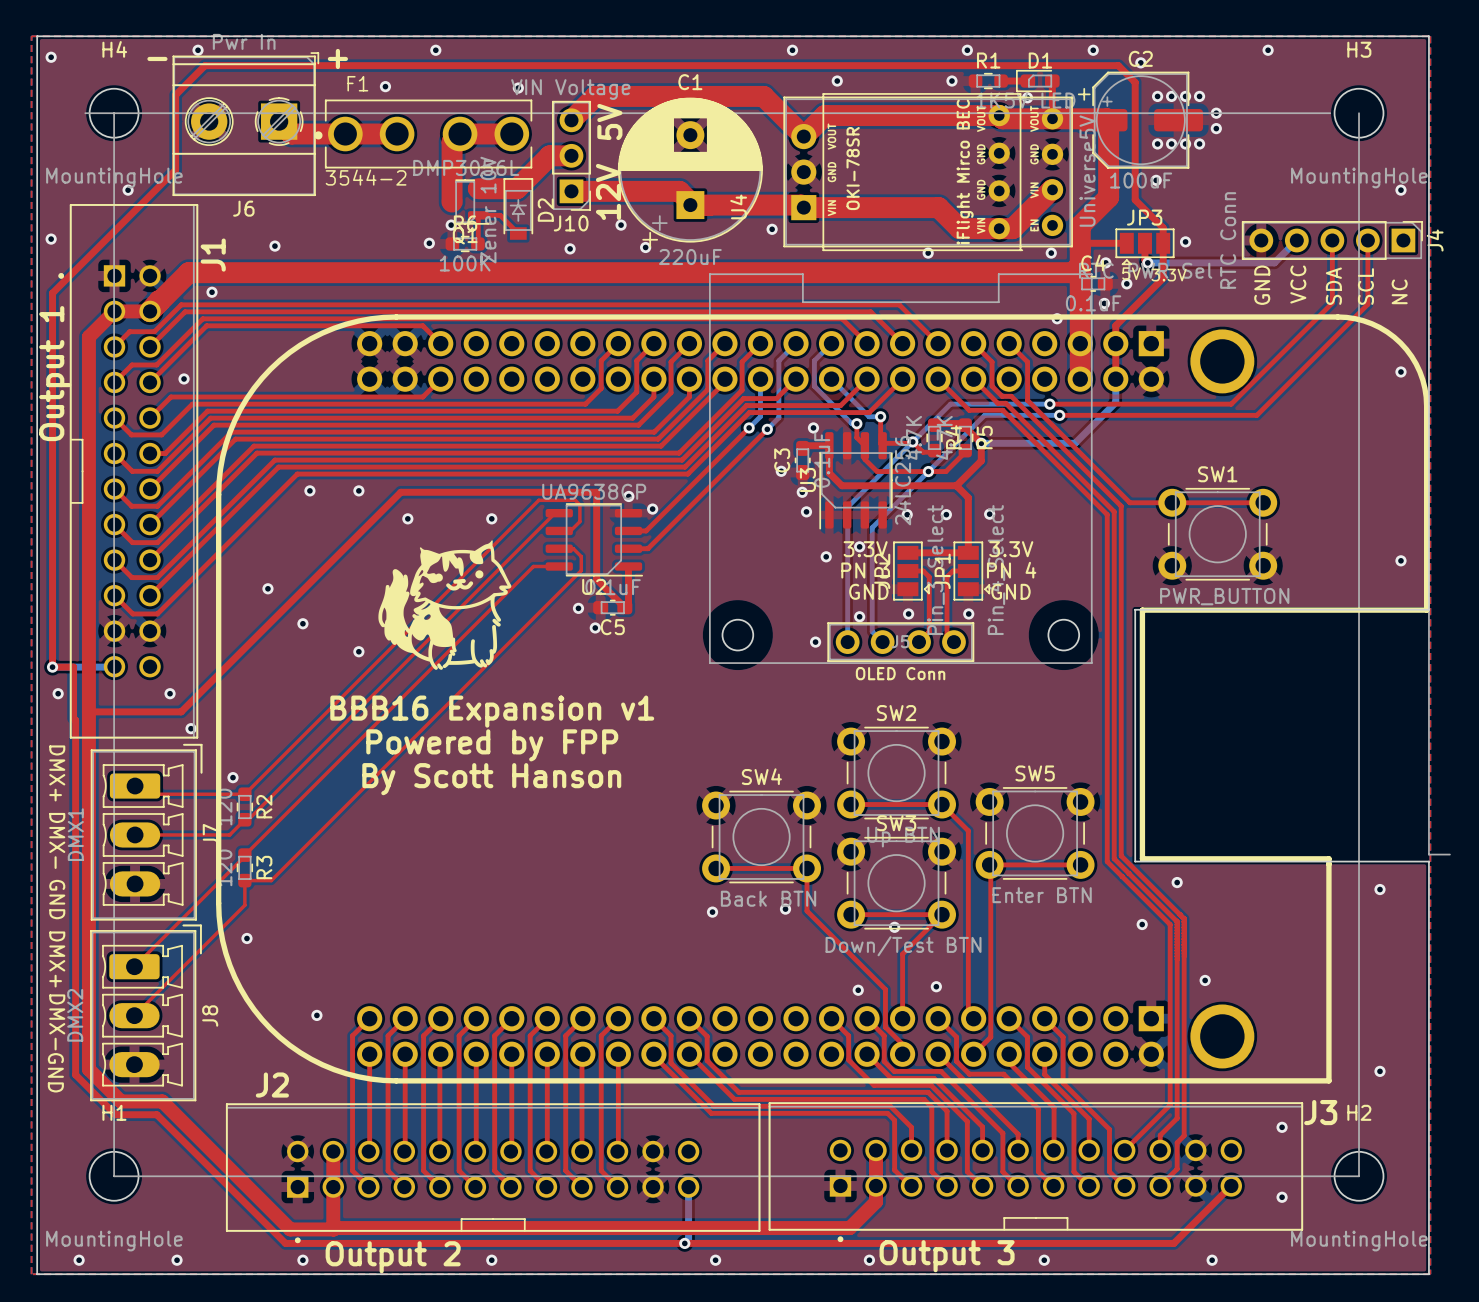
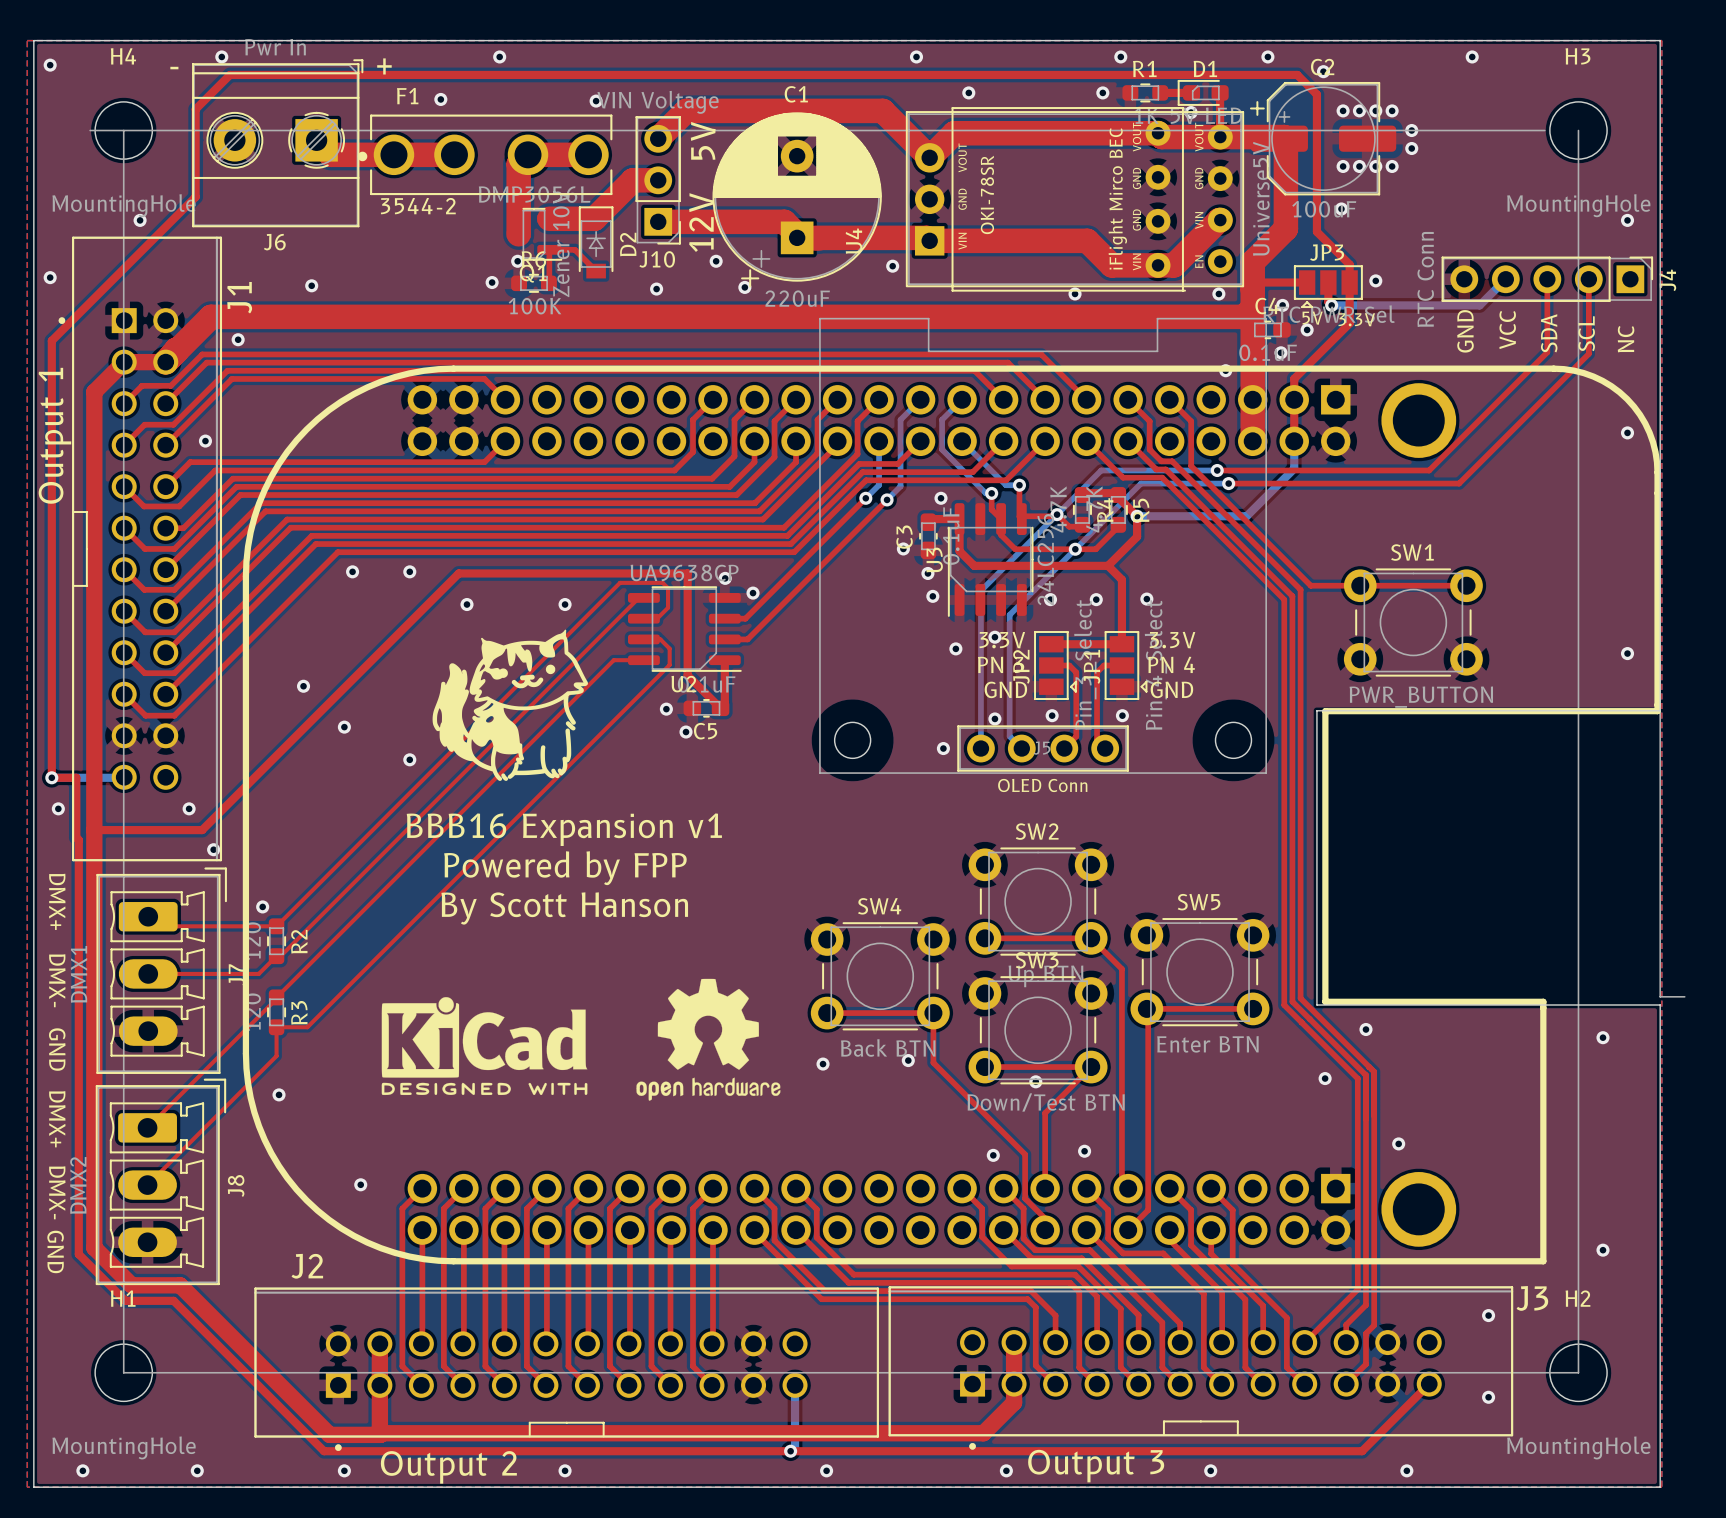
drawing: none -> [636, 978, 781, 1101]
drawing: none -> [381, 997, 588, 1096]

